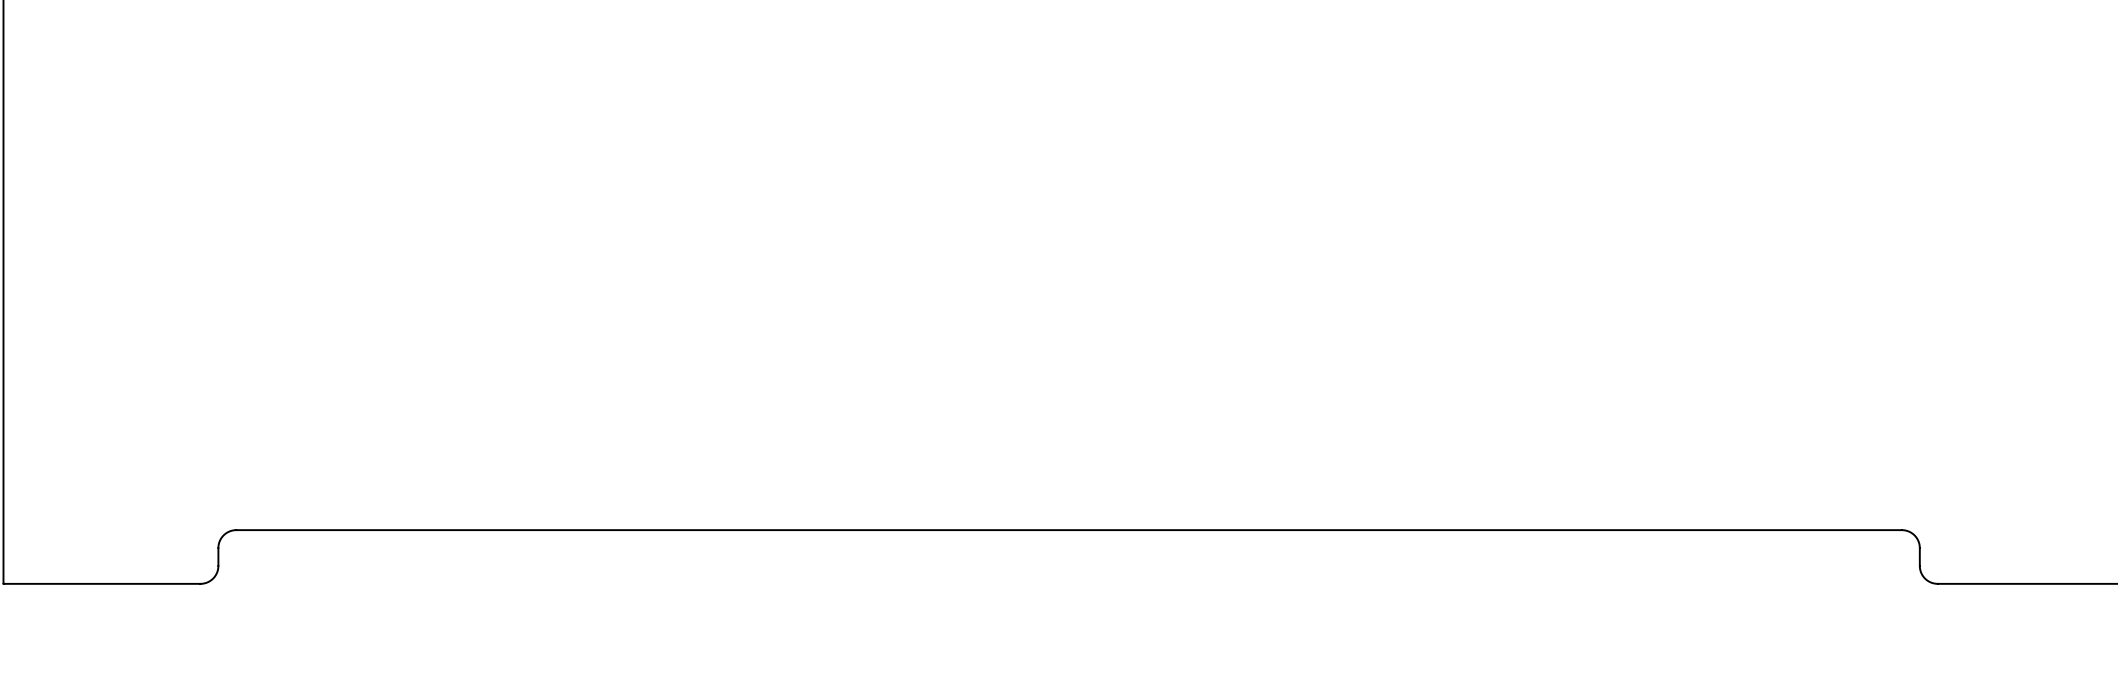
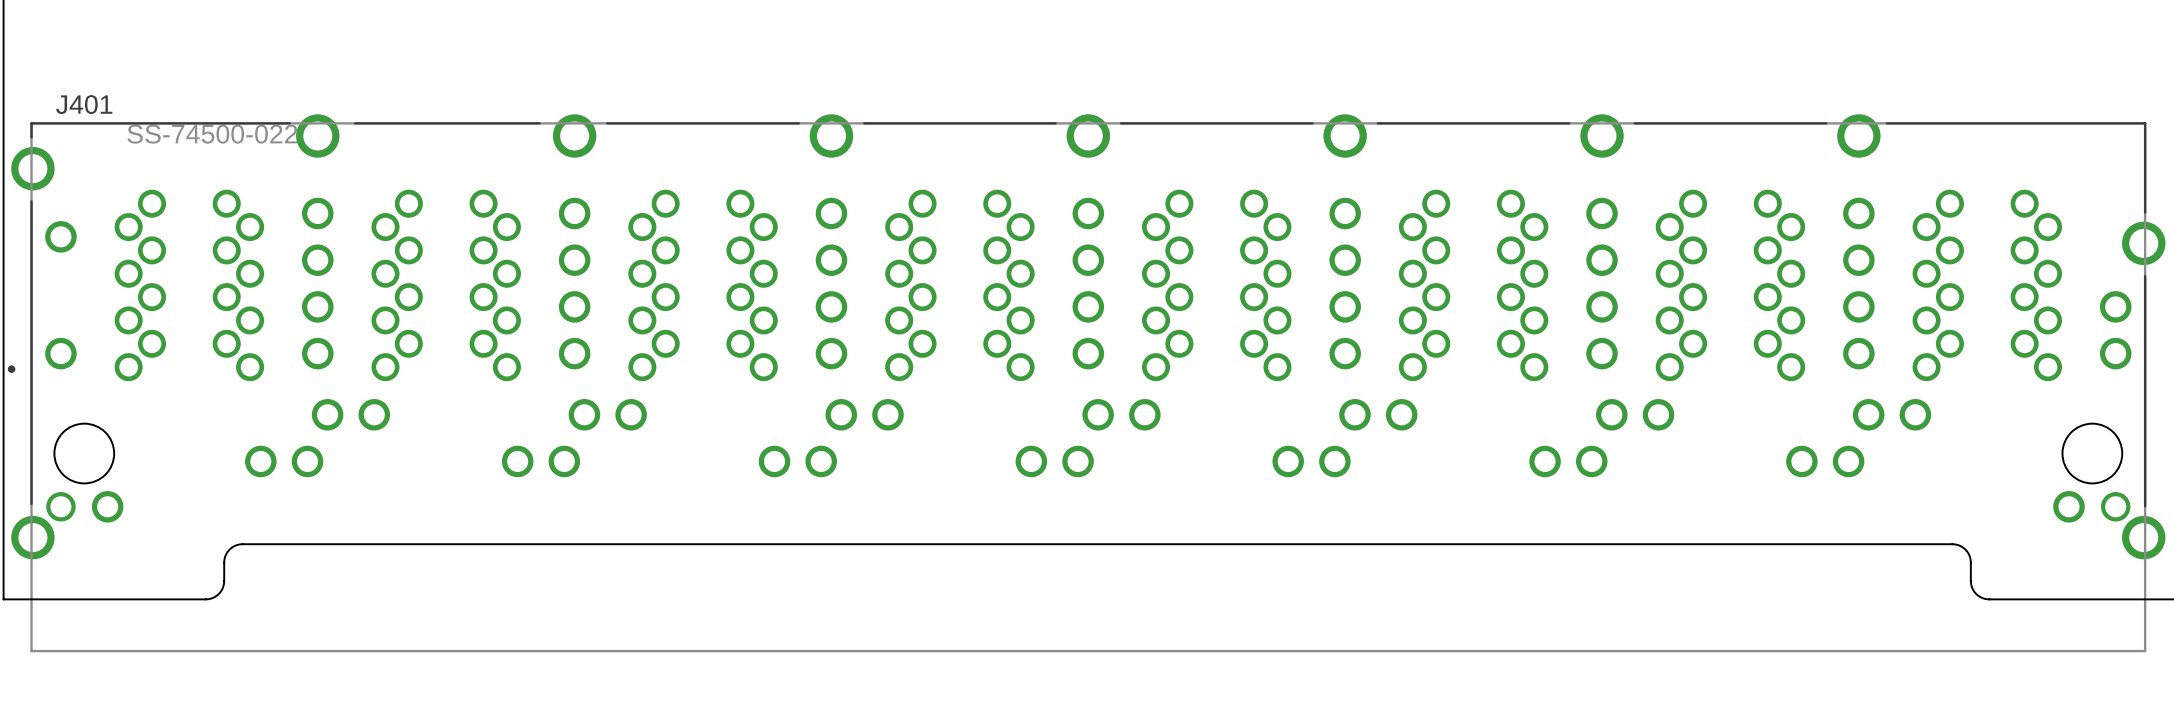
J401: none -> SS-74500-022 (1086, 383)

